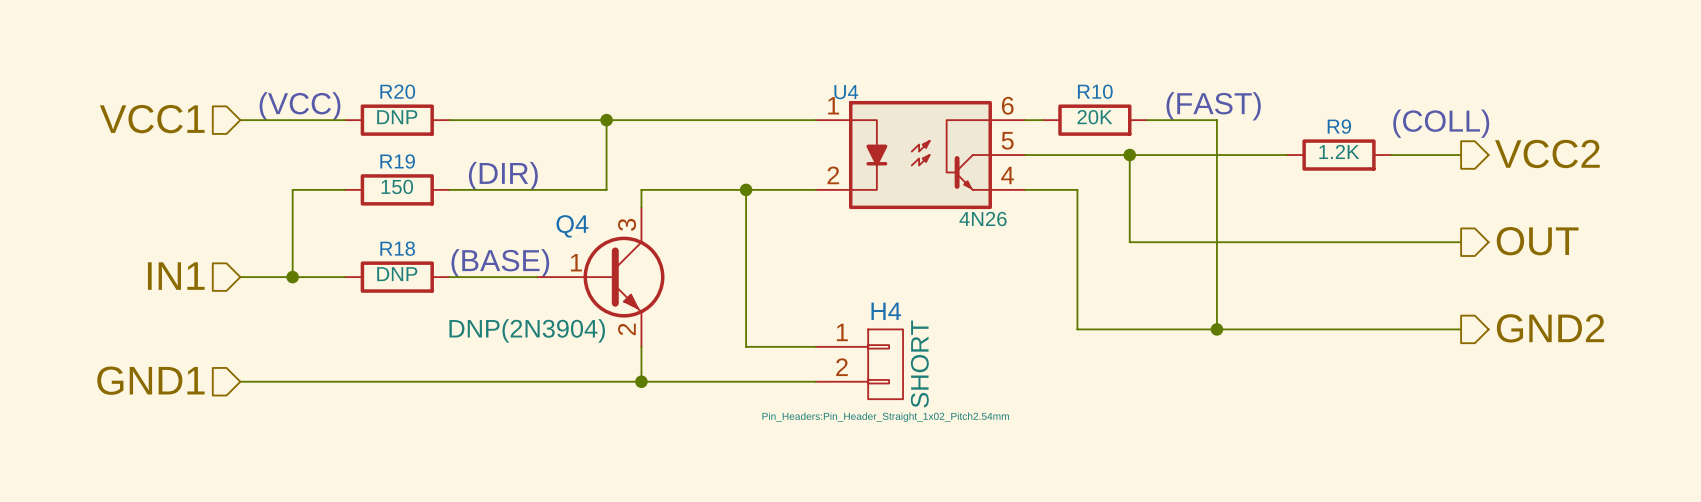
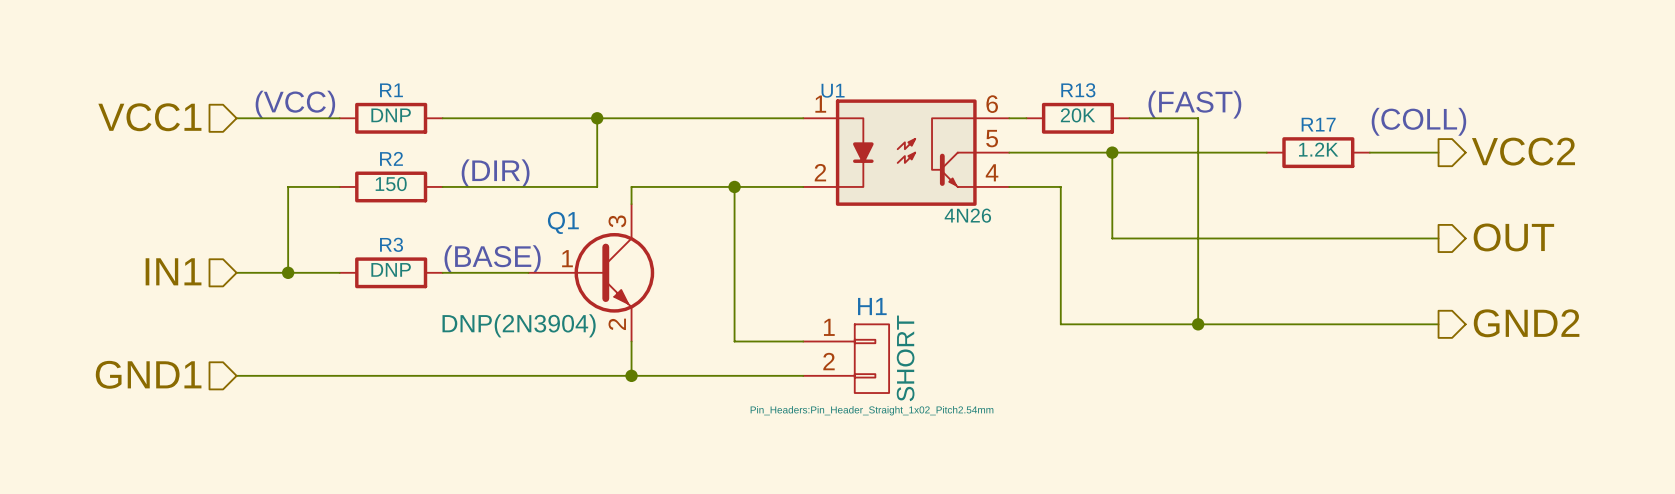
R20 name: R20 (397, 91) -> R1 (391, 90)
R10 name: R10 (1095, 91) -> R13 (1078, 90)
U4 name: U4 (846, 92) -> U1 (833, 90)
R9 name: R9 (1339, 126) -> R17 (1318, 124)
R19 name: R19 (397, 161) -> R2 (391, 158)
Q4 name: Q4 (572, 226) -> Q1 (563, 222)
R18 name: R18 (397, 248) -> R3 (391, 244)
H4 name: H4 (886, 311) -> H1 (872, 306)

